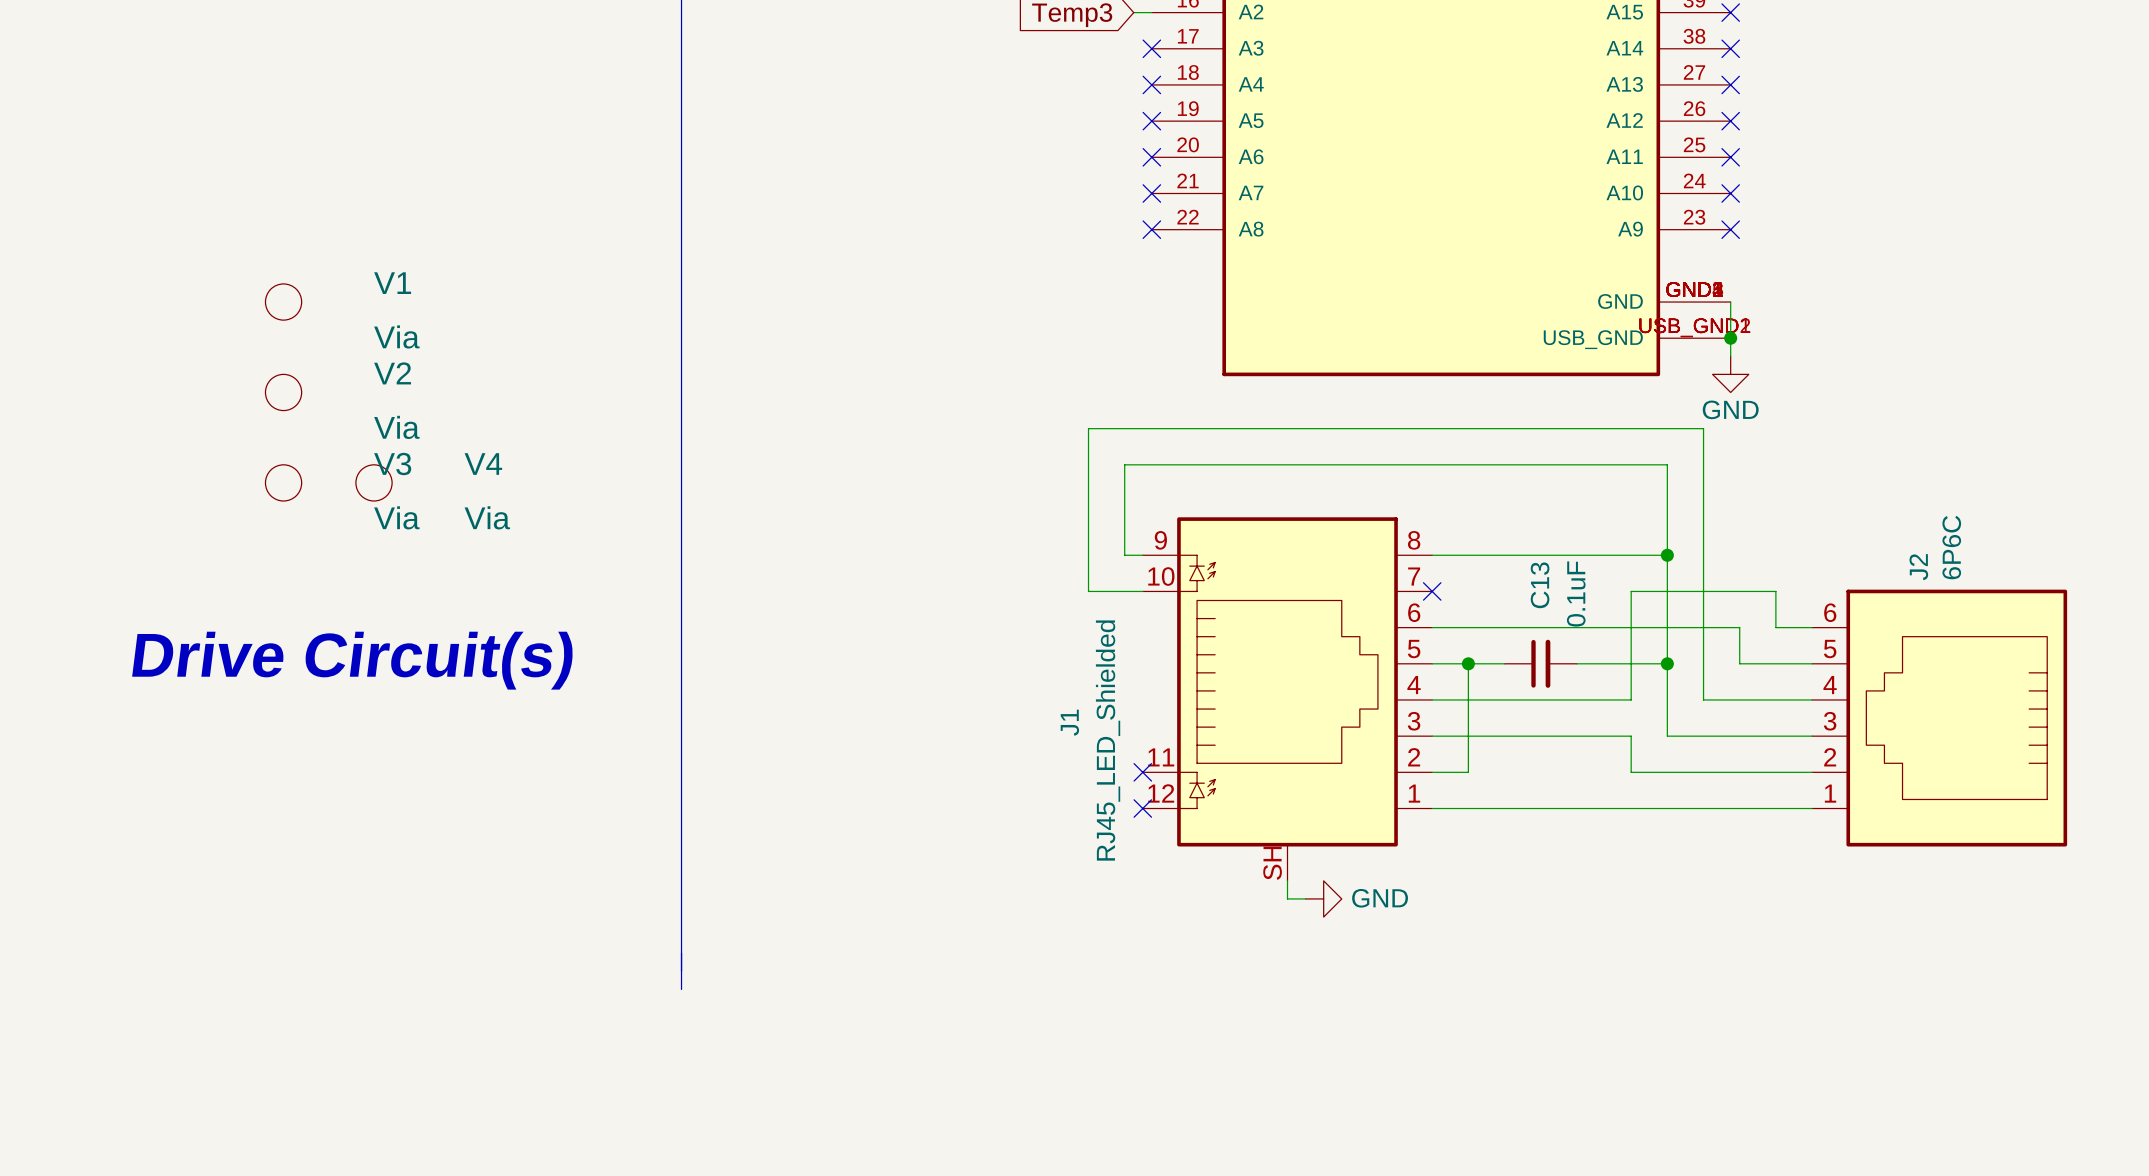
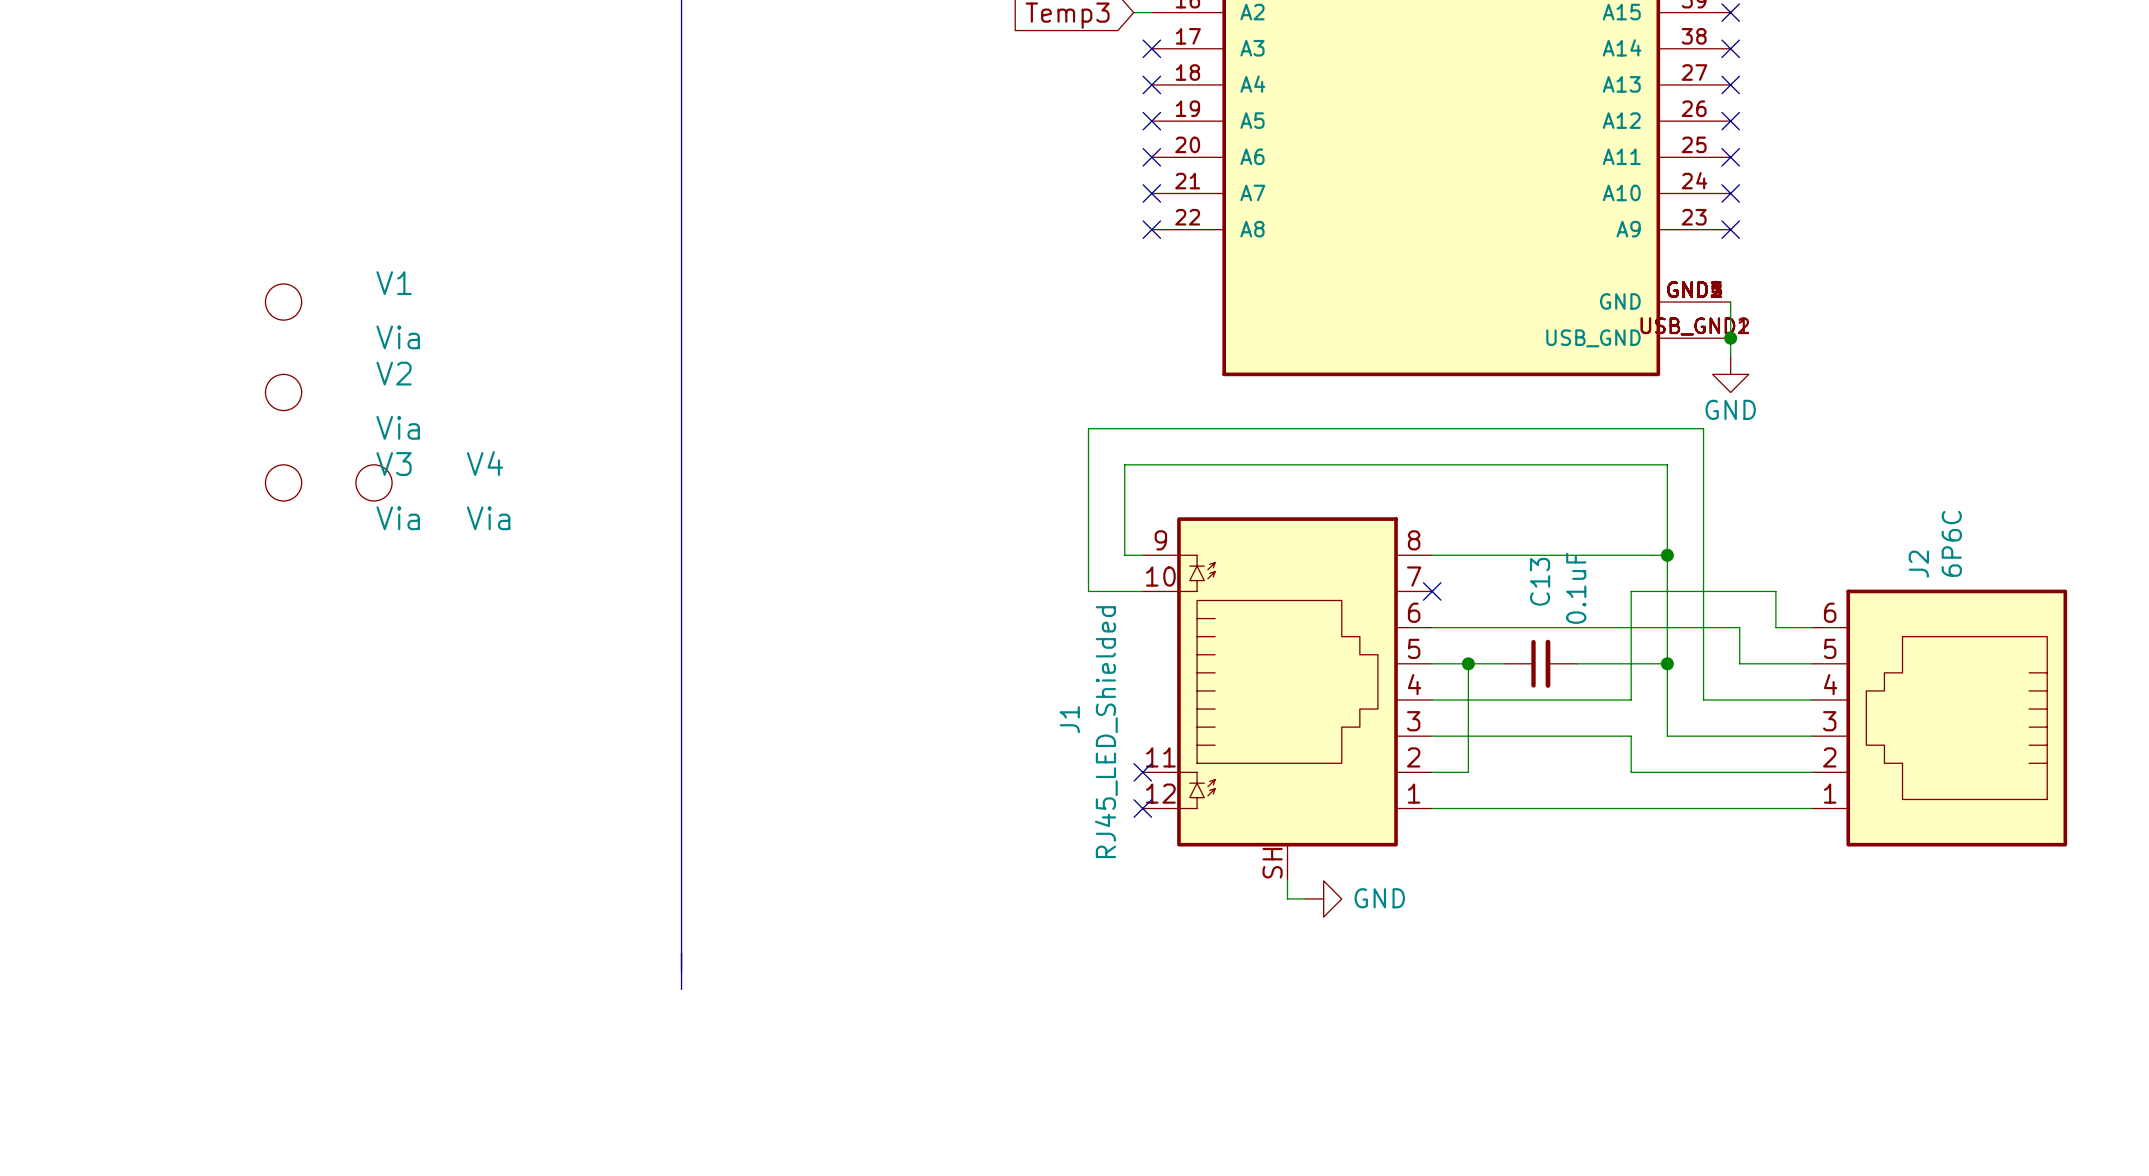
text: Drive Circuit(s) (352, 660) -> none

